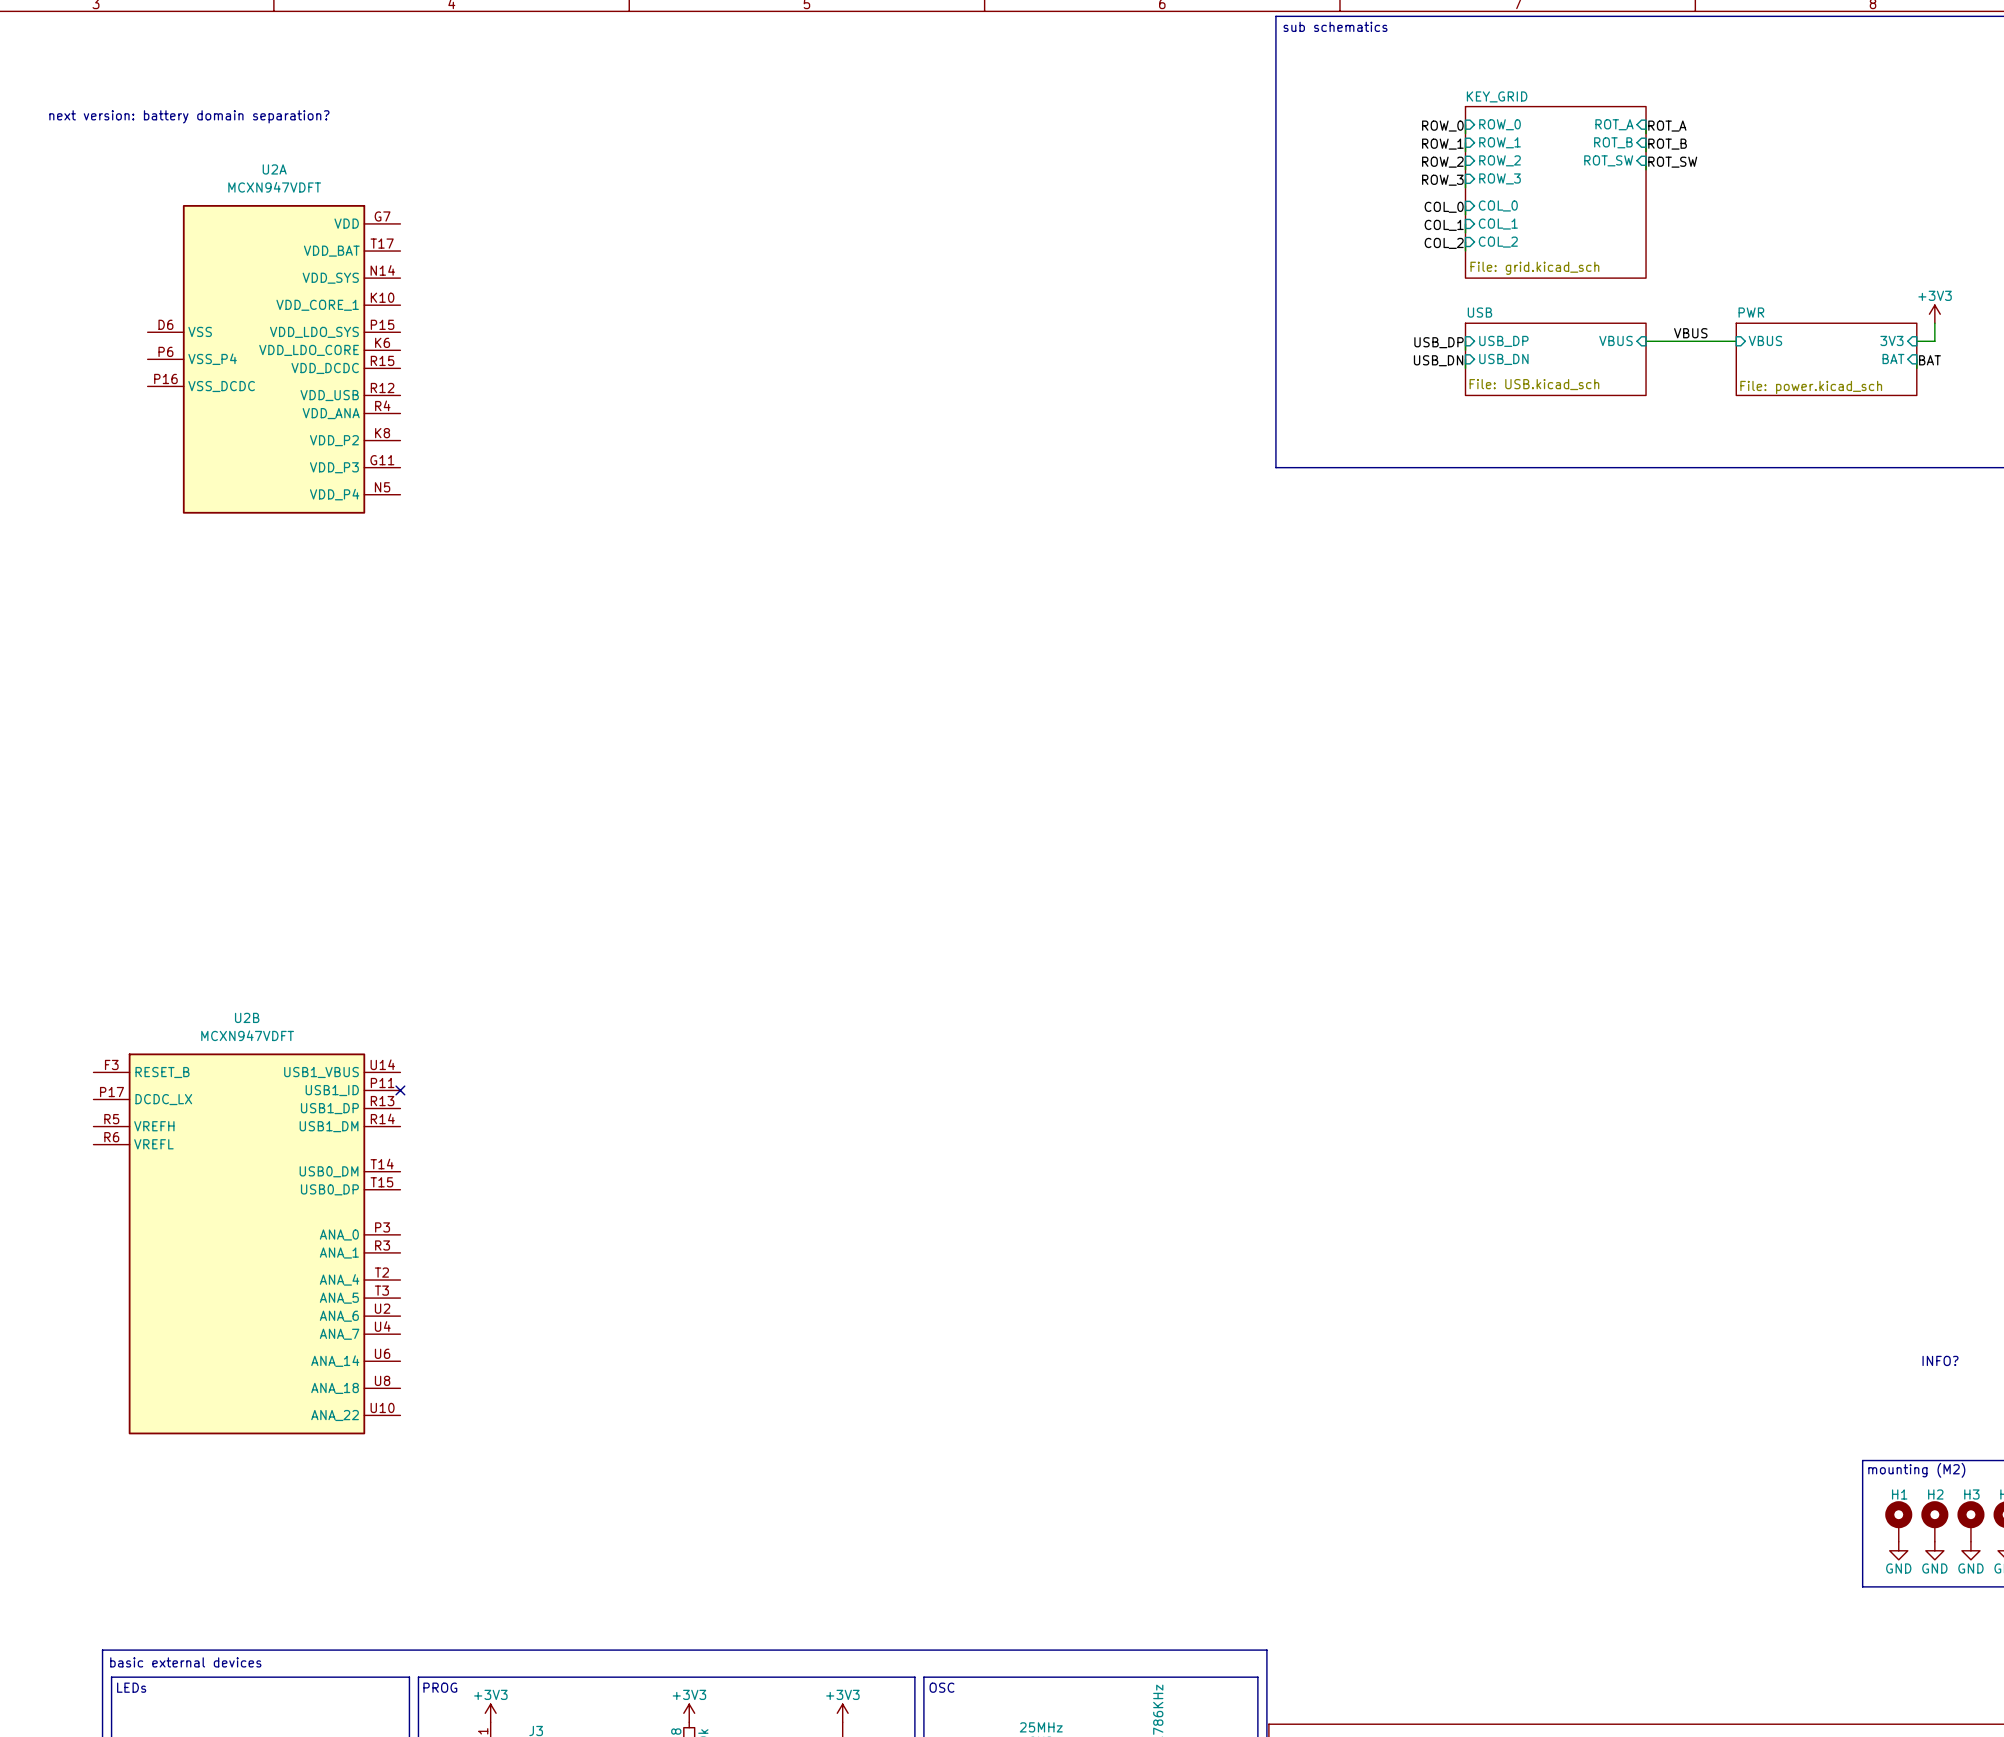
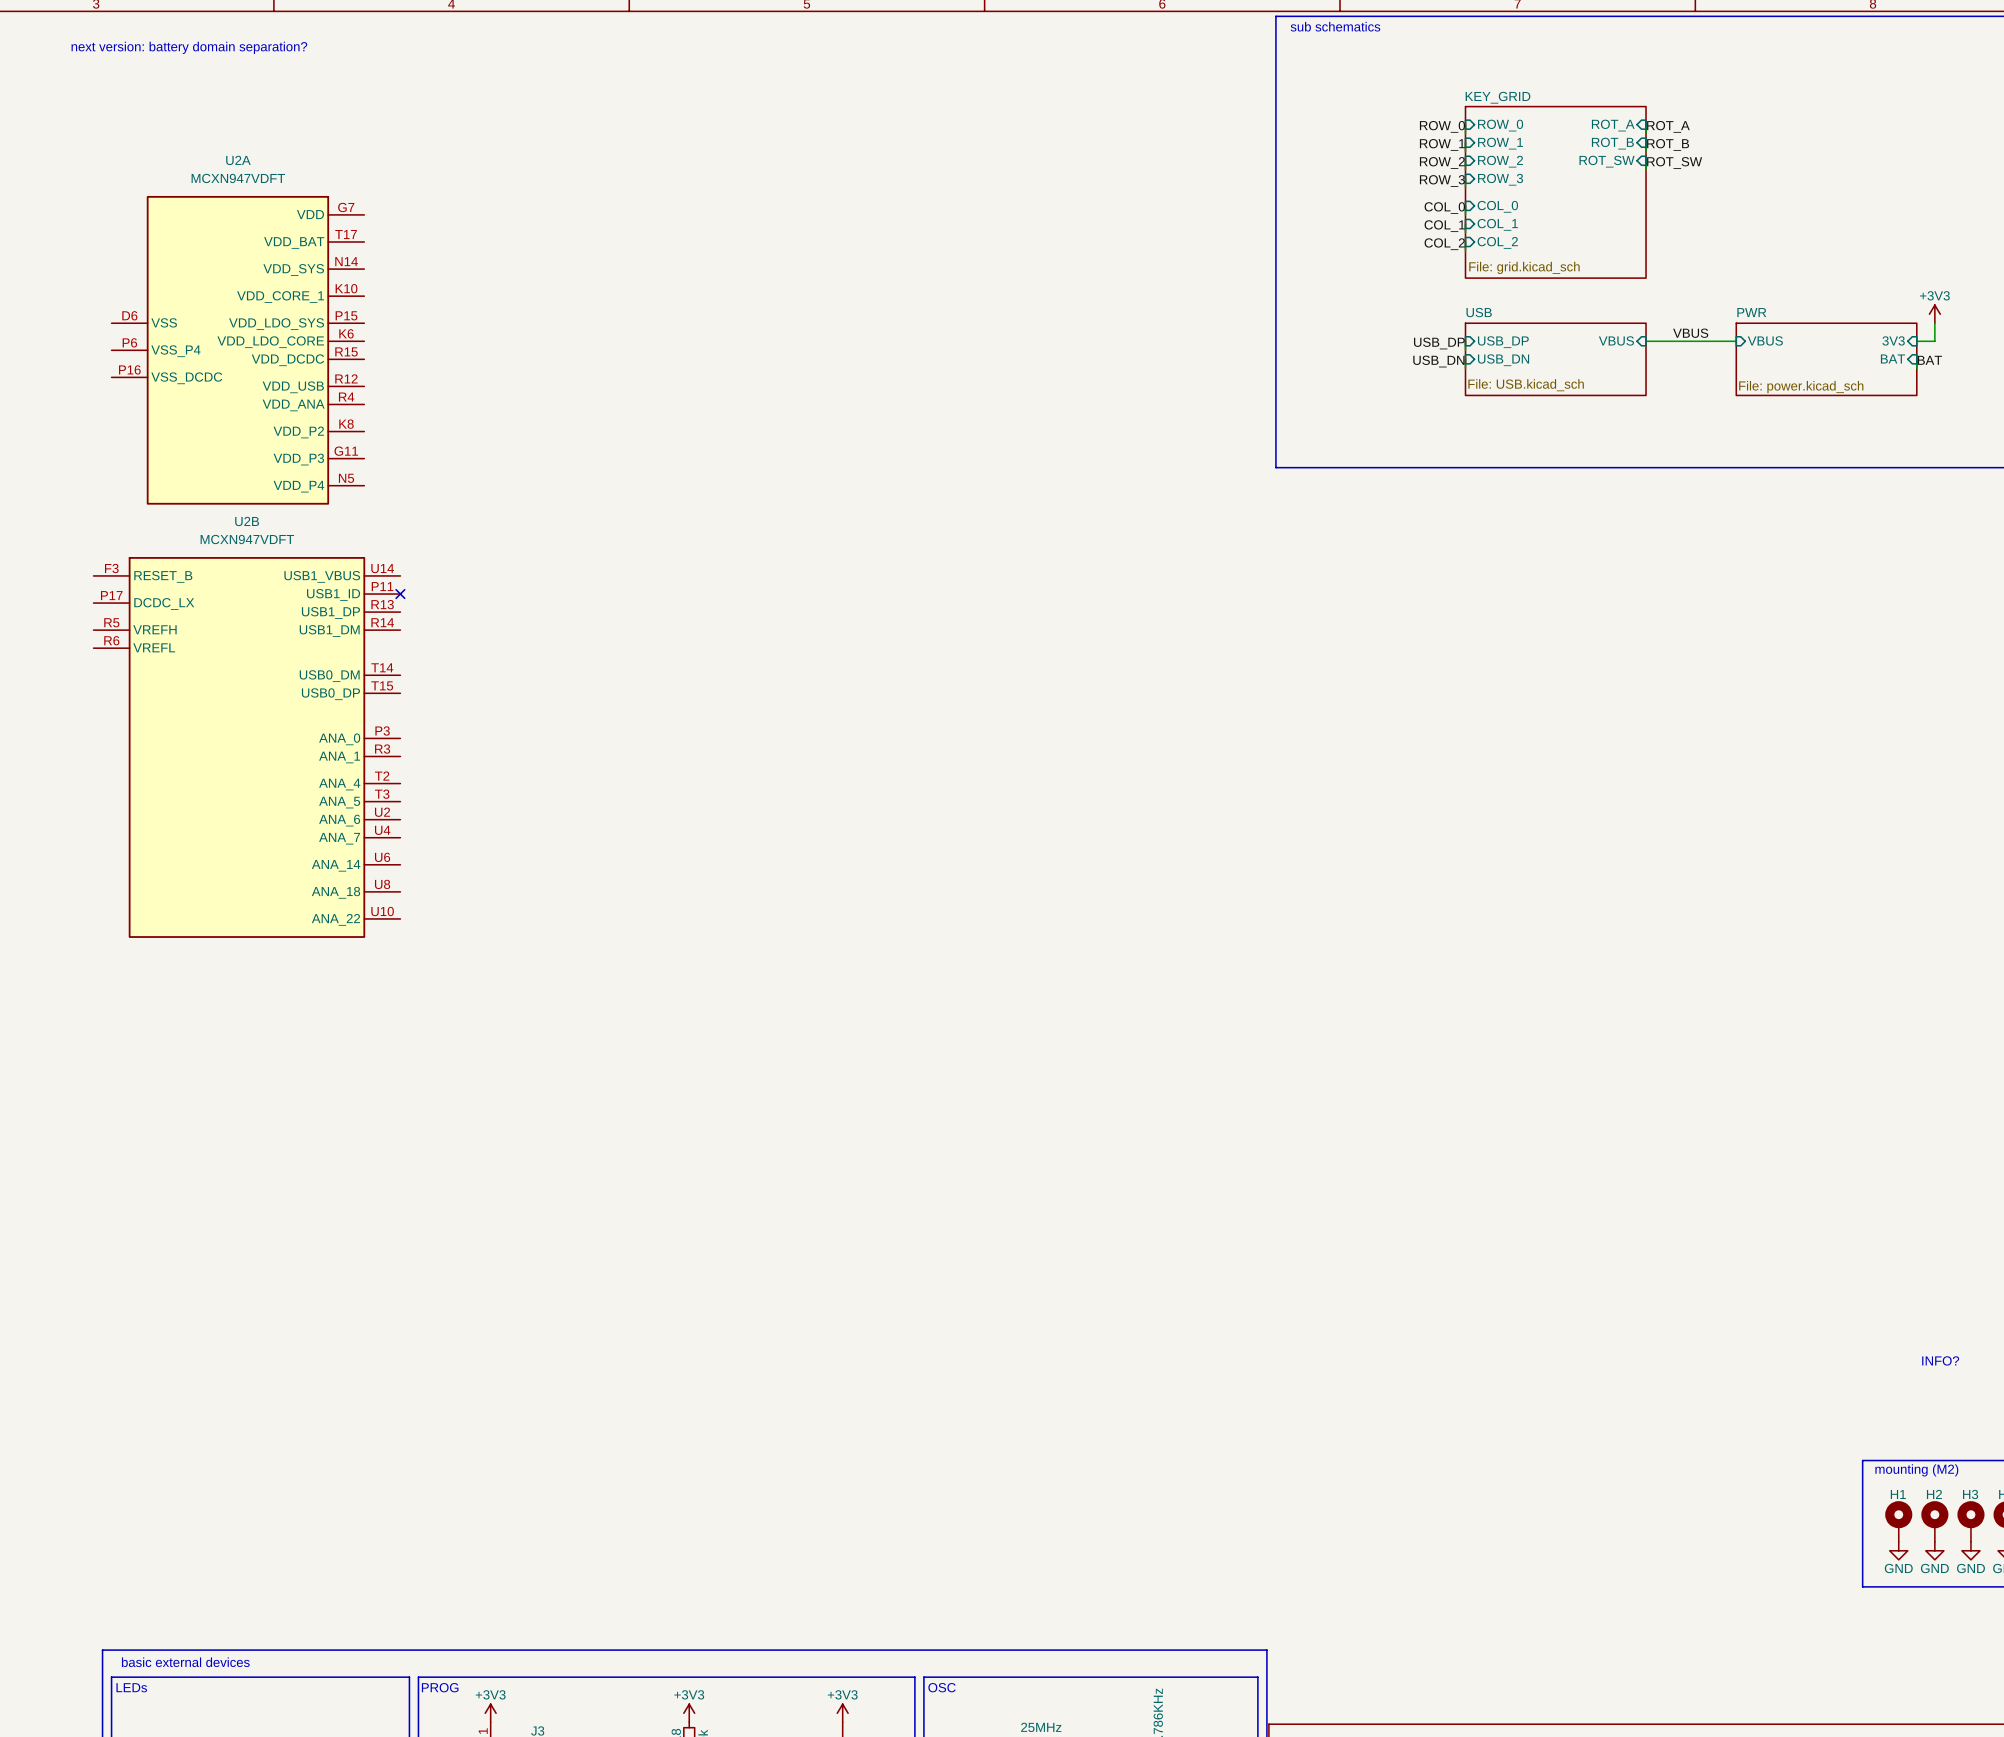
text position: next version: battery domain separation? (189, 116) -> next version: battery domain separation? (189, 47)
U2A position: (274, 359) -> (237, 350)
no-connect mark: none -> (400, 594)
no-connect mark: (400, 1090) -> none
U2B position: (246, 1243) -> (246, 747)

